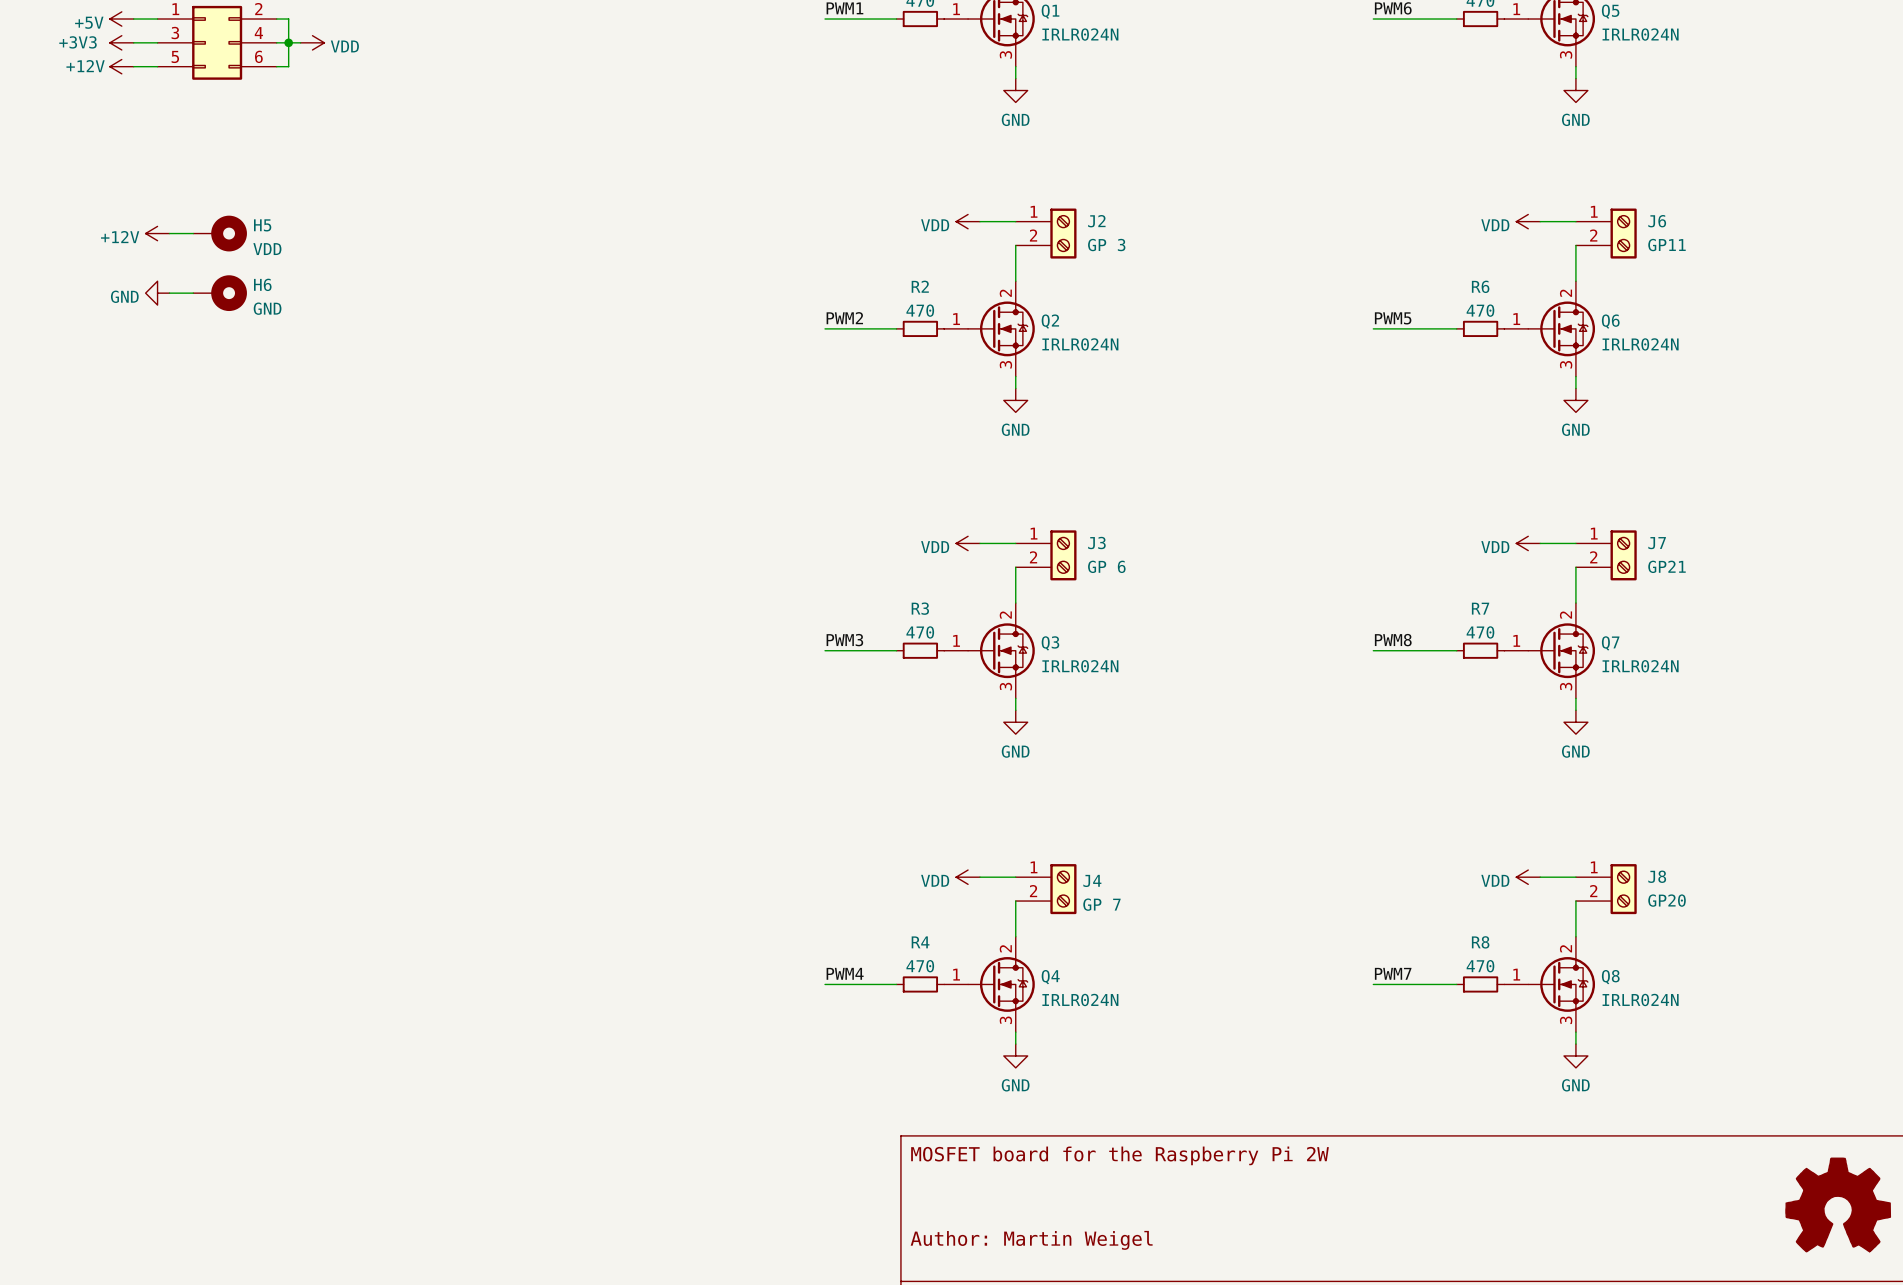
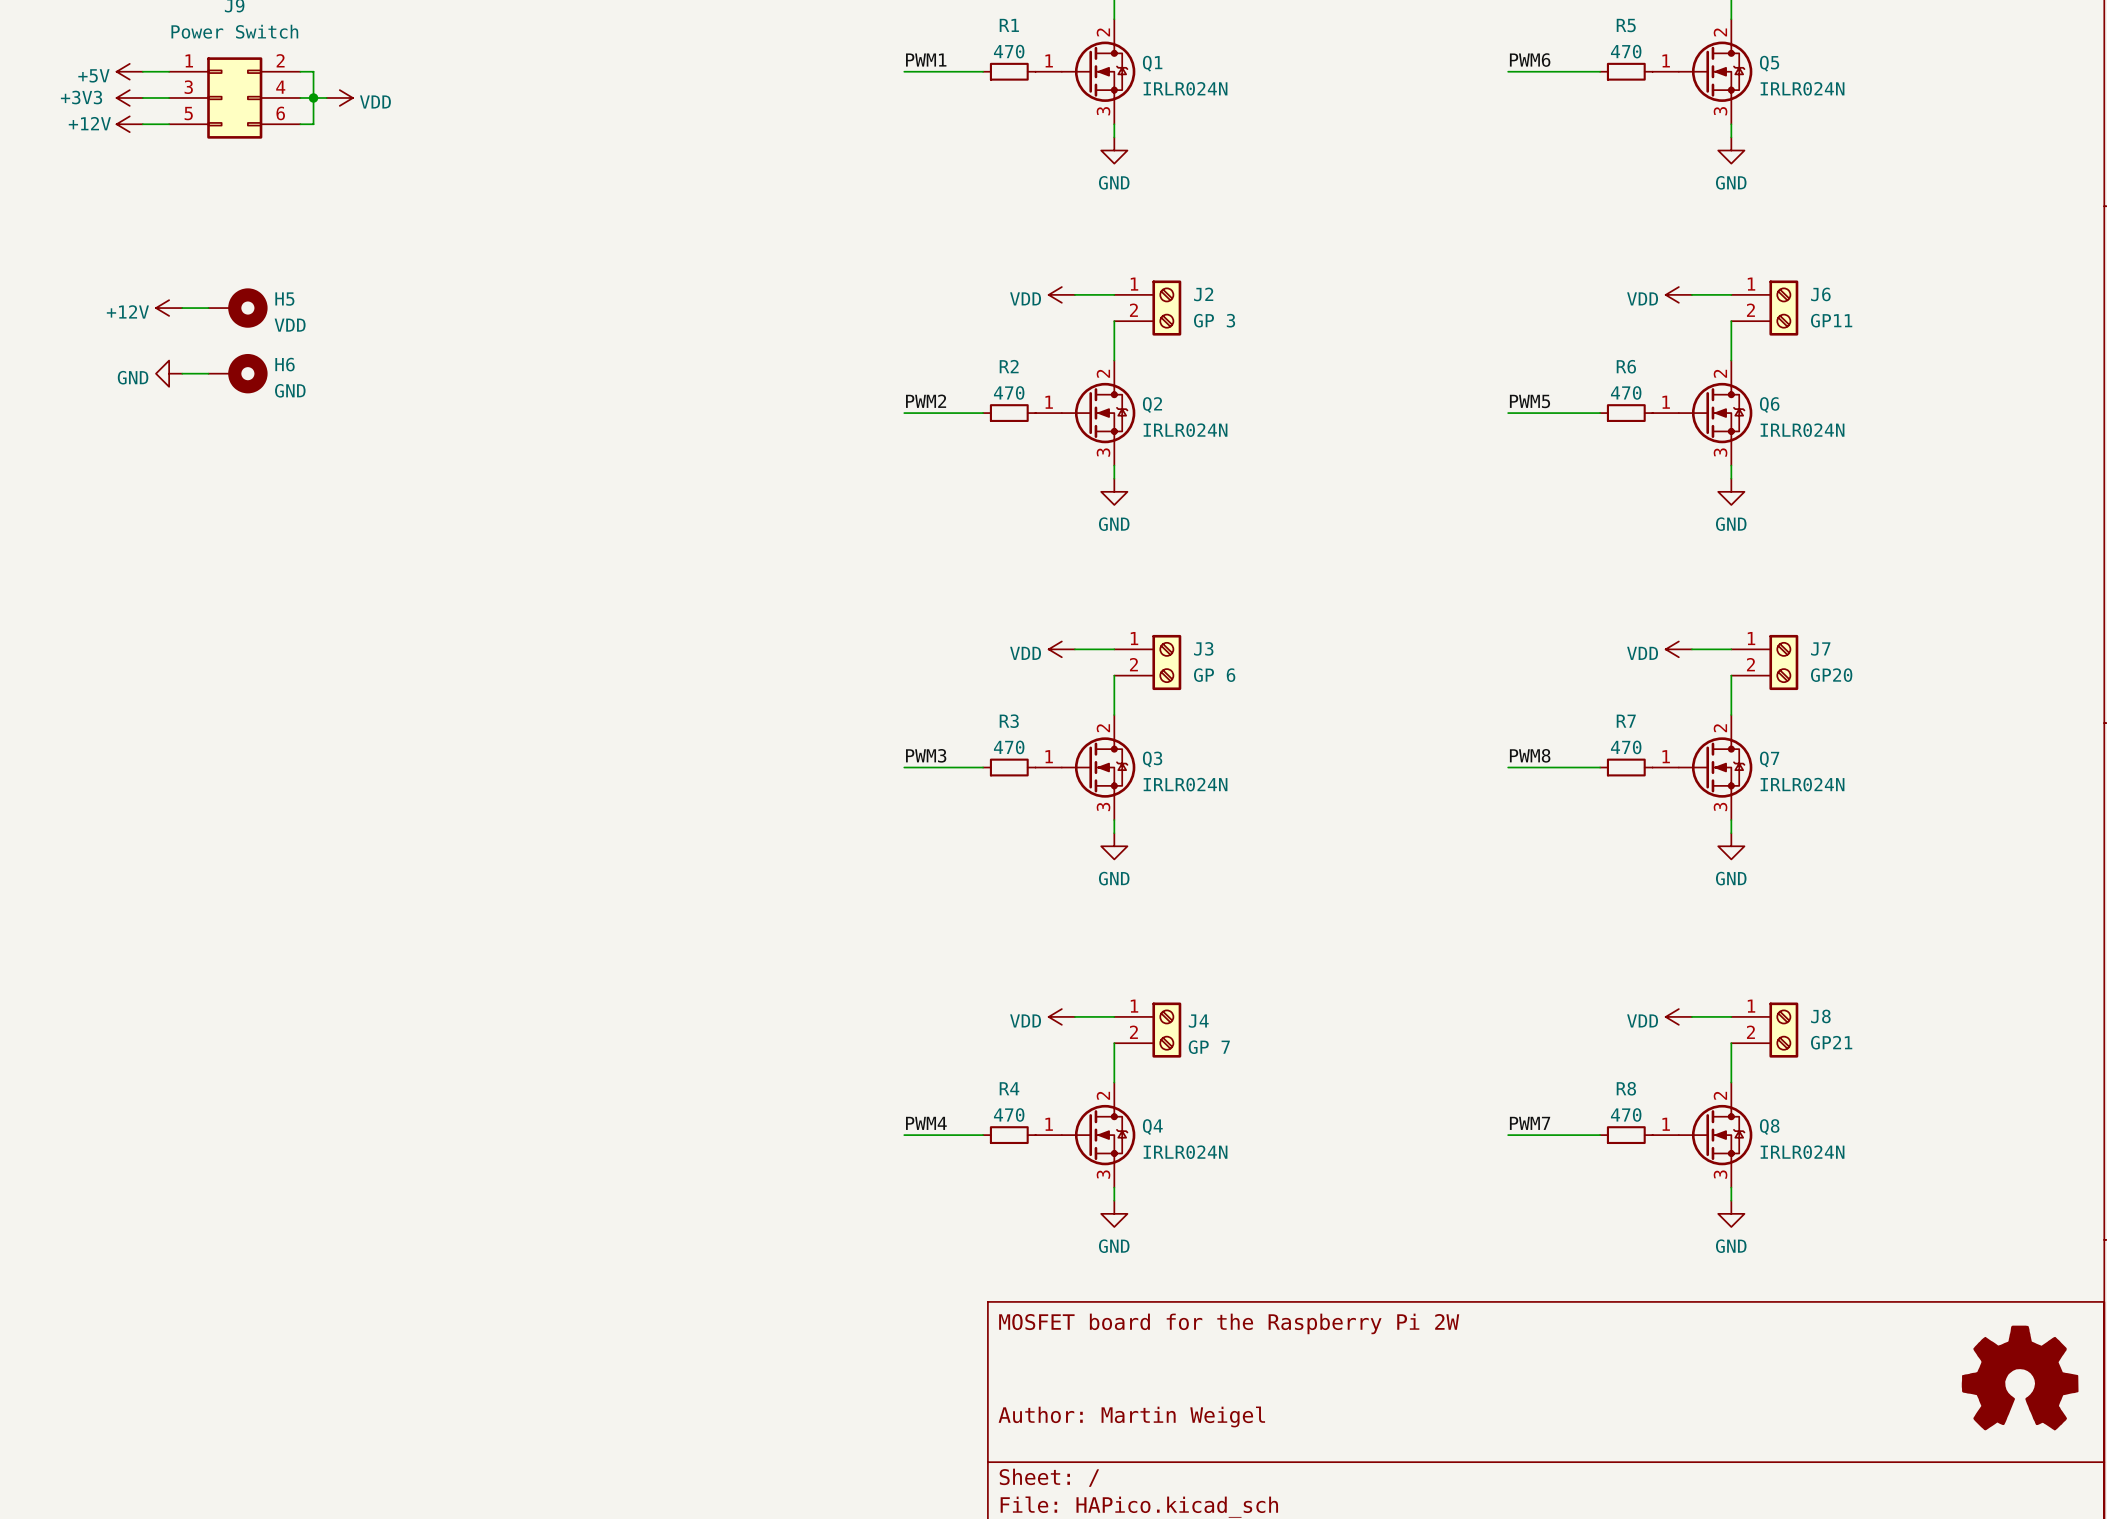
J7 value: GP21 (1666, 566) -> GP20 (1831, 675)
J8 value: GP20 (1667, 900) -> GP21 (1831, 1042)

